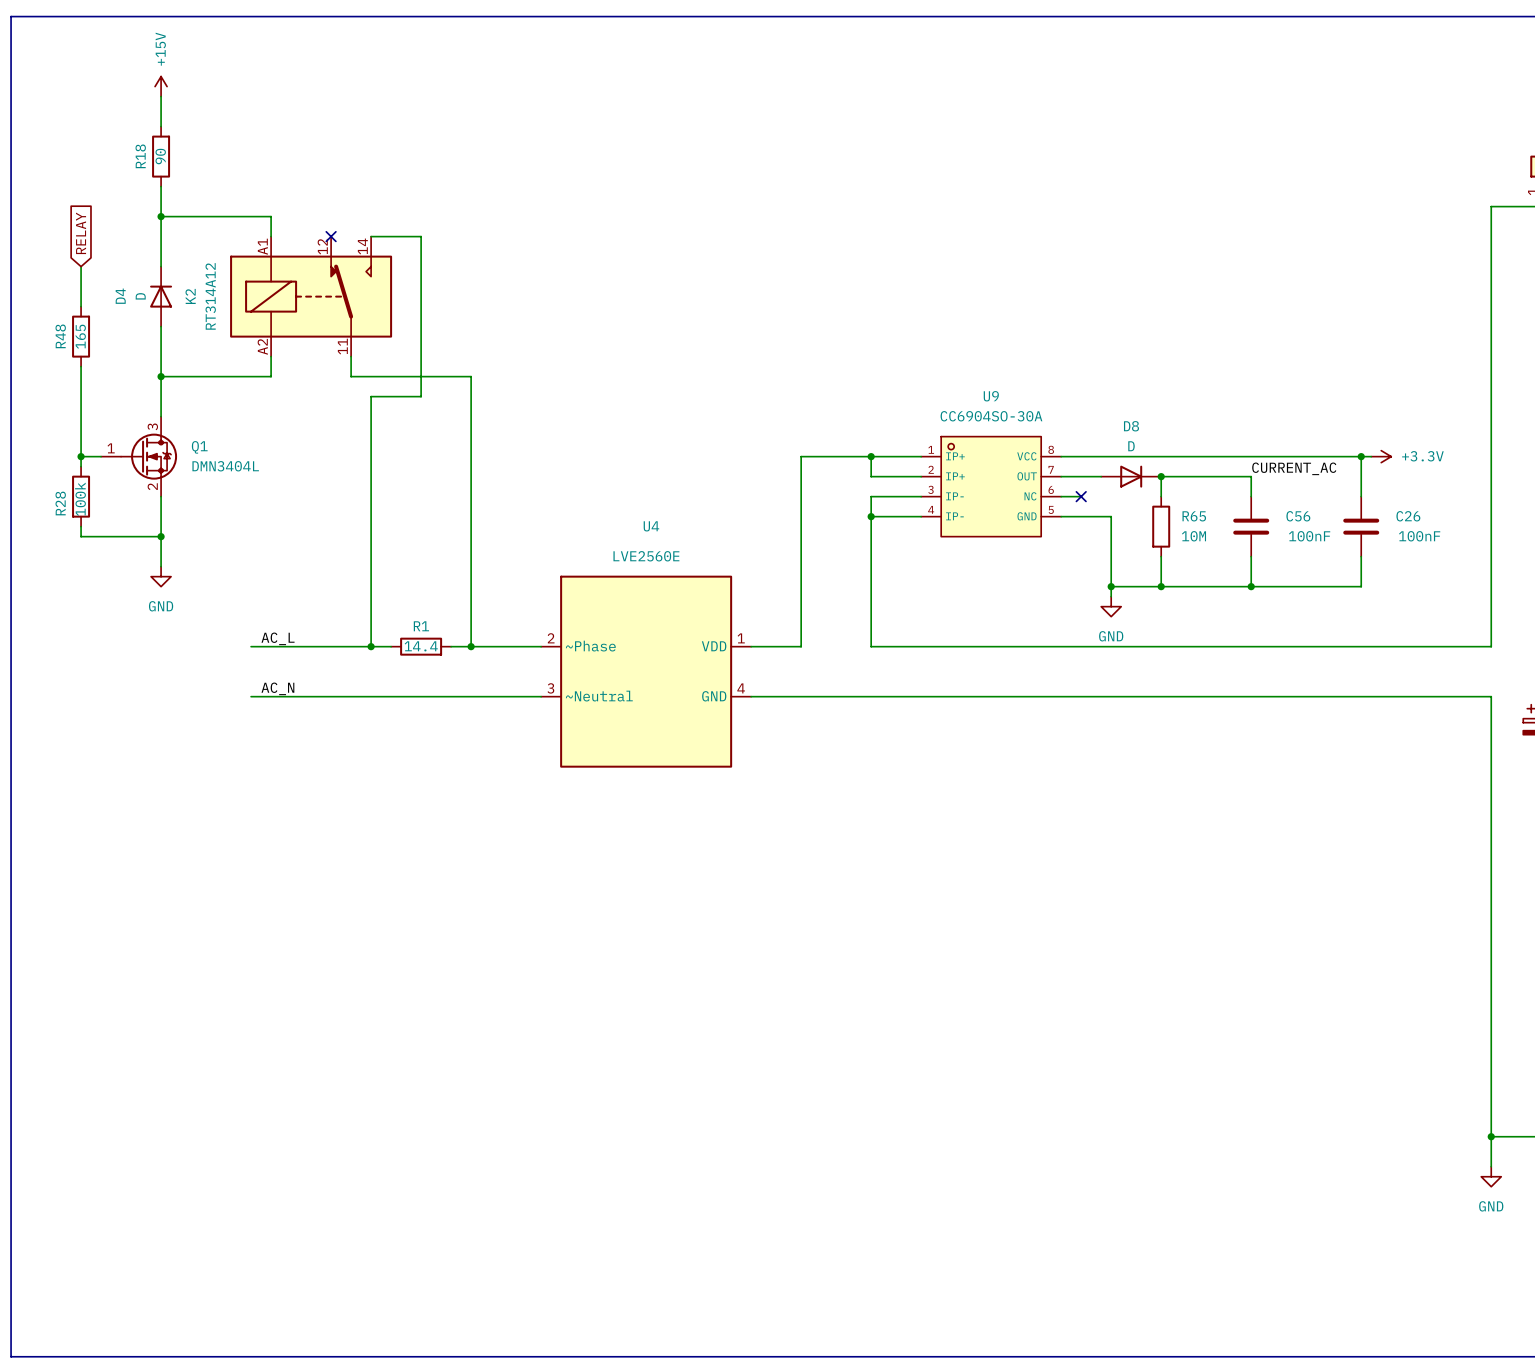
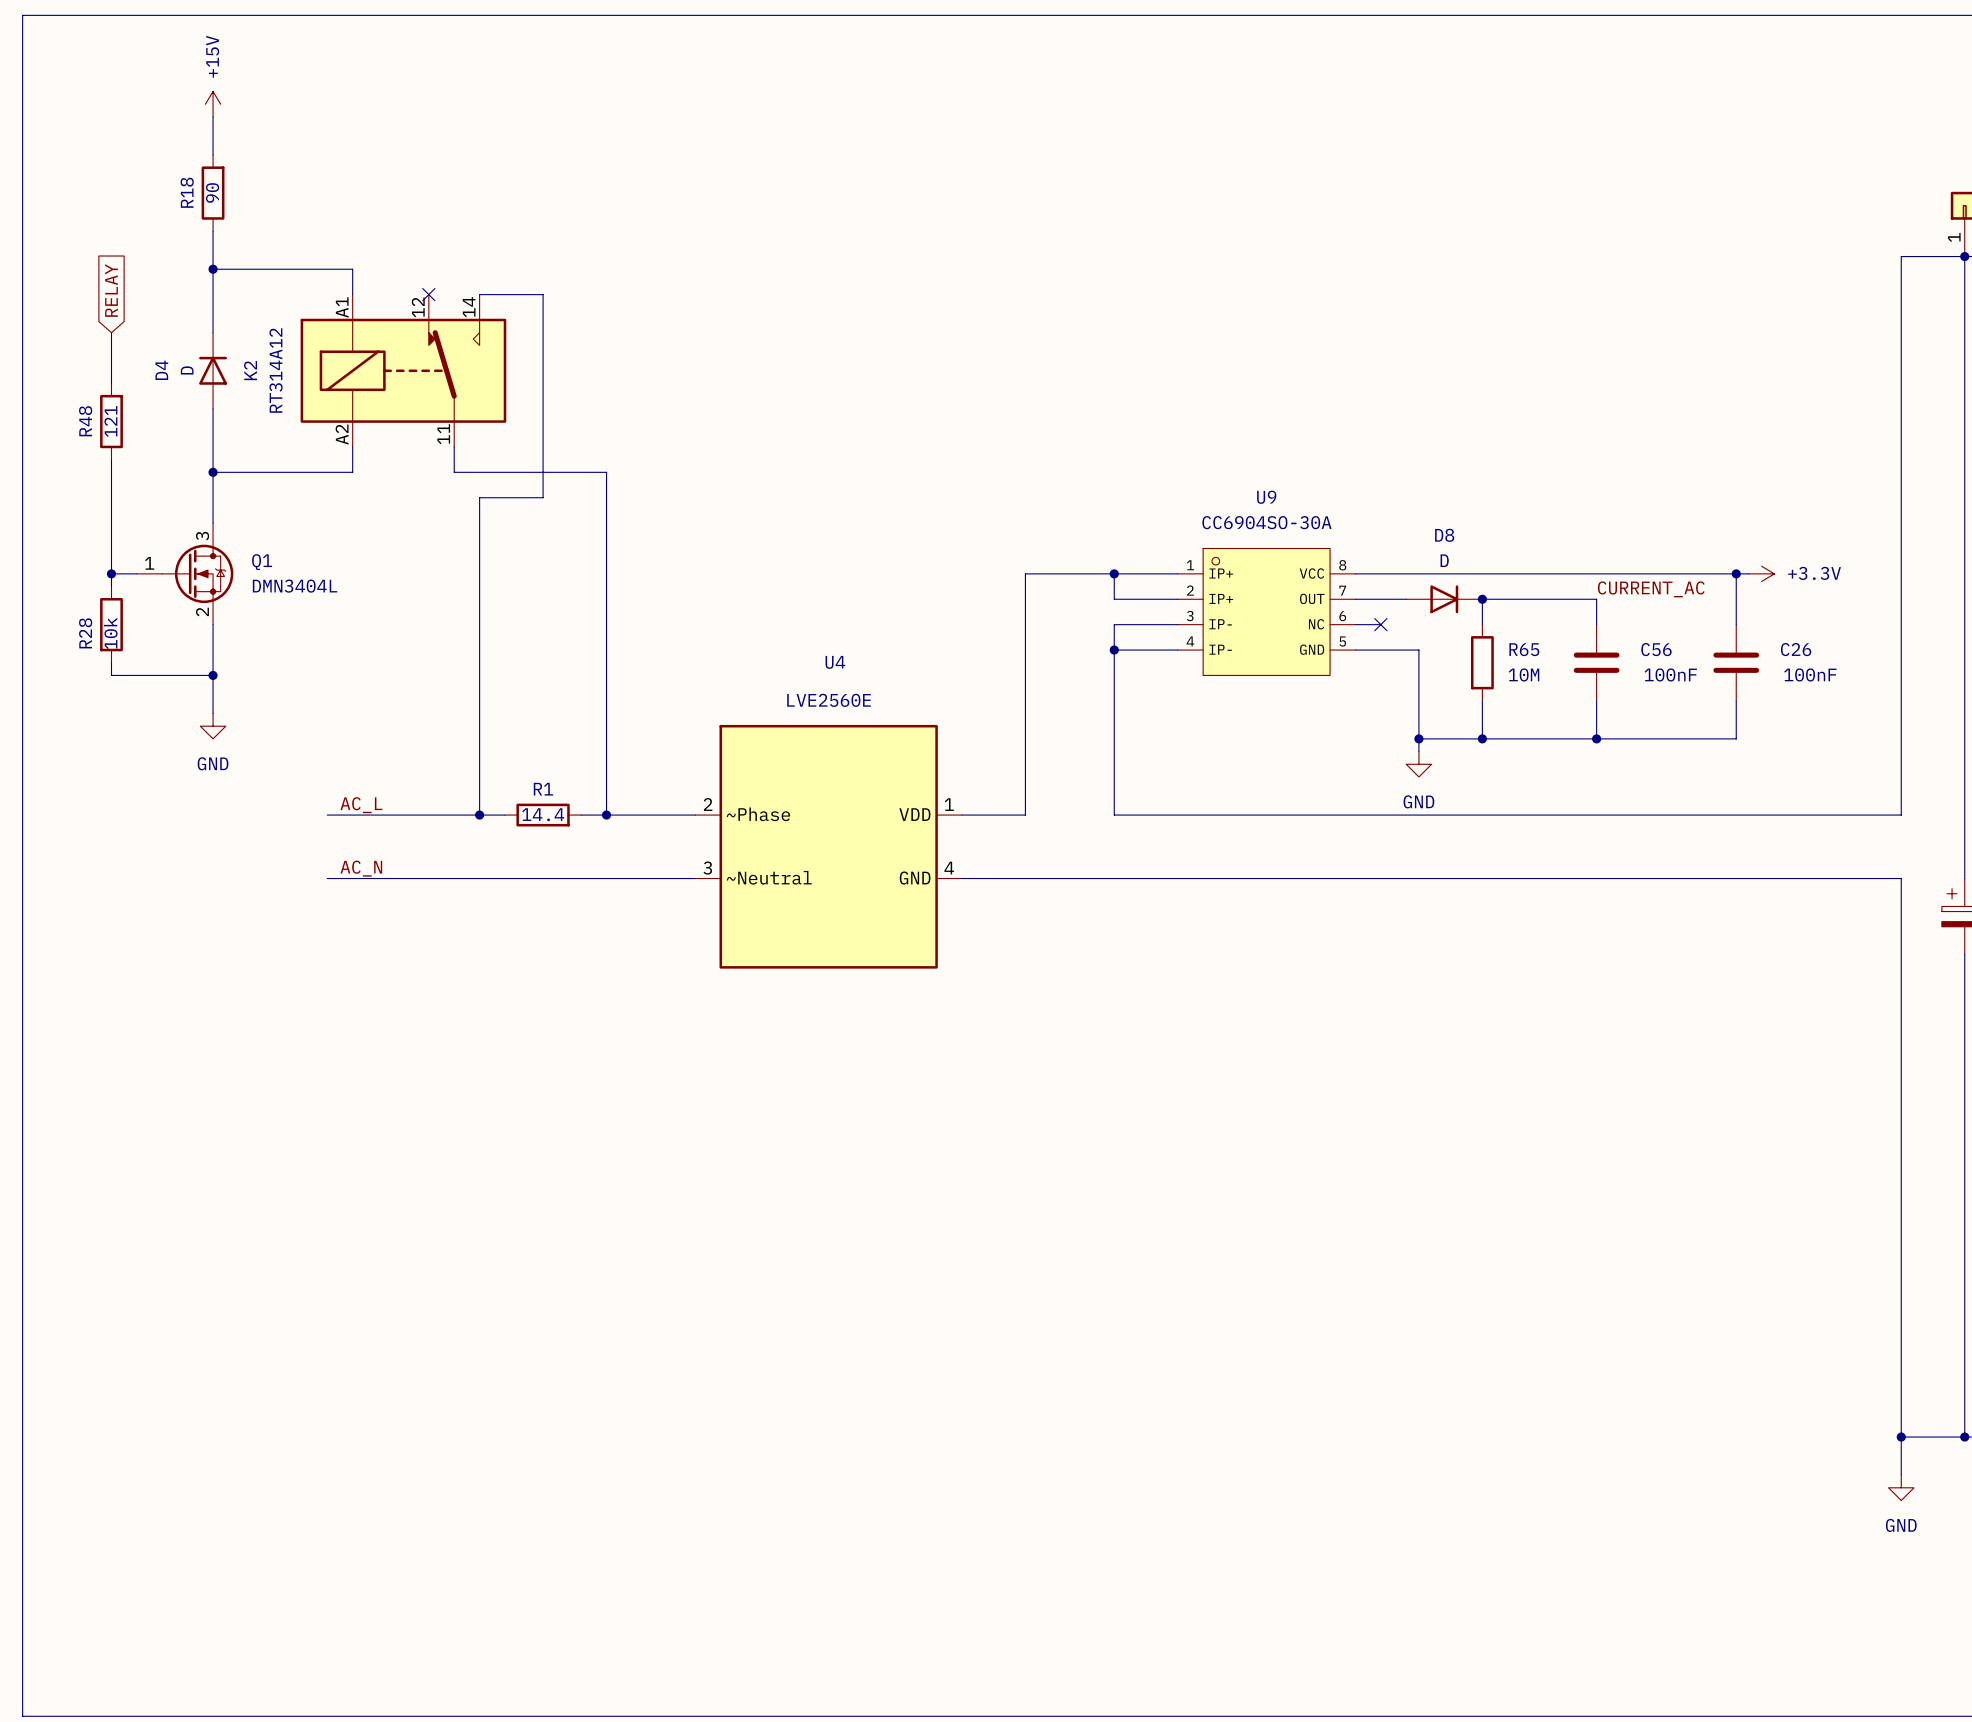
R48 value: 165 (80, 336) -> 121 (110, 421)
R28 value: 100k (80, 499) -> 10k (110, 633)

